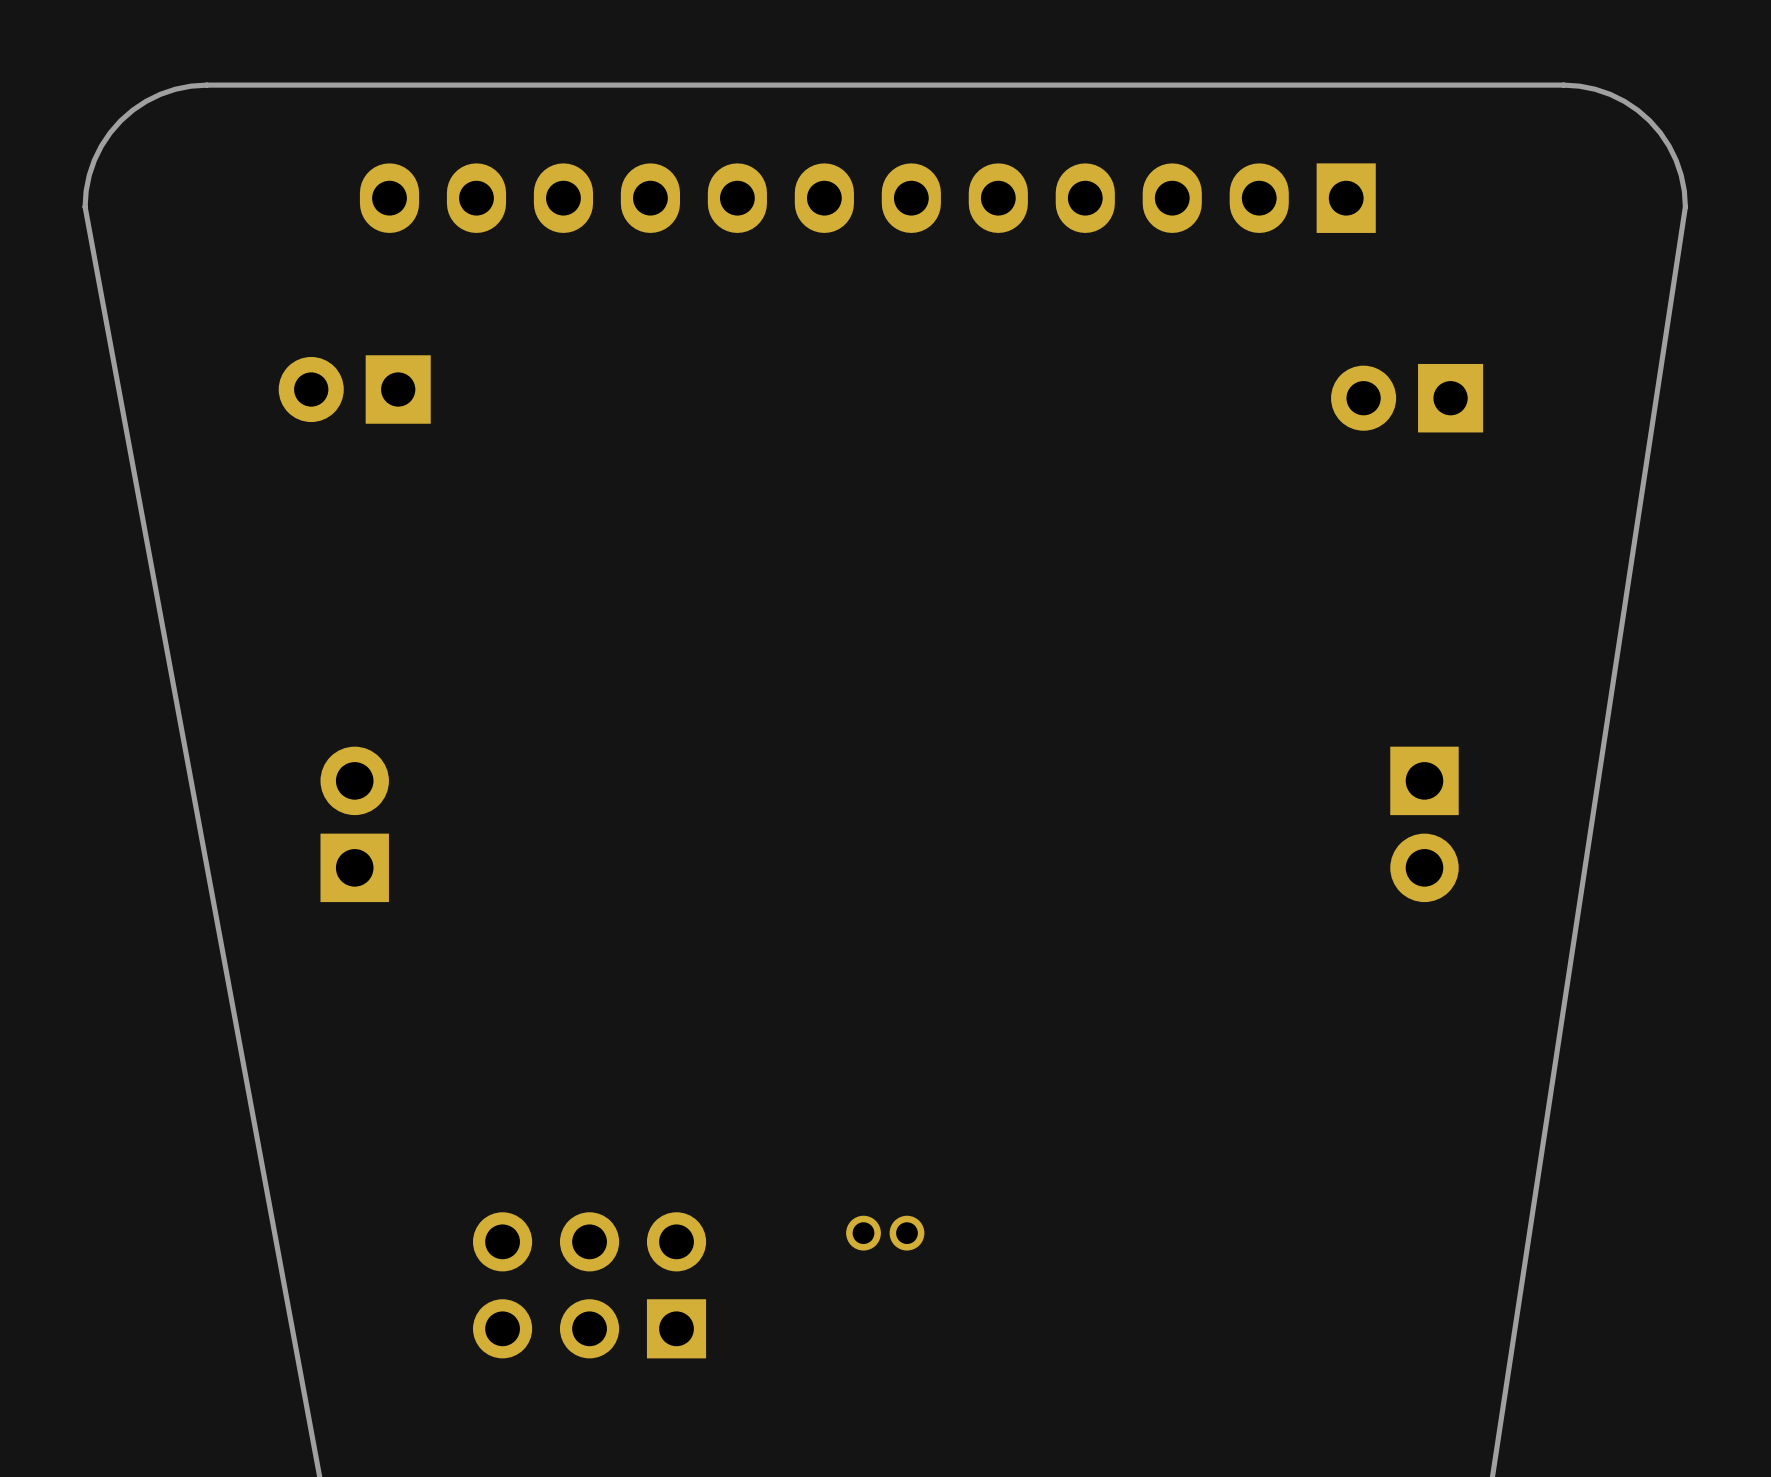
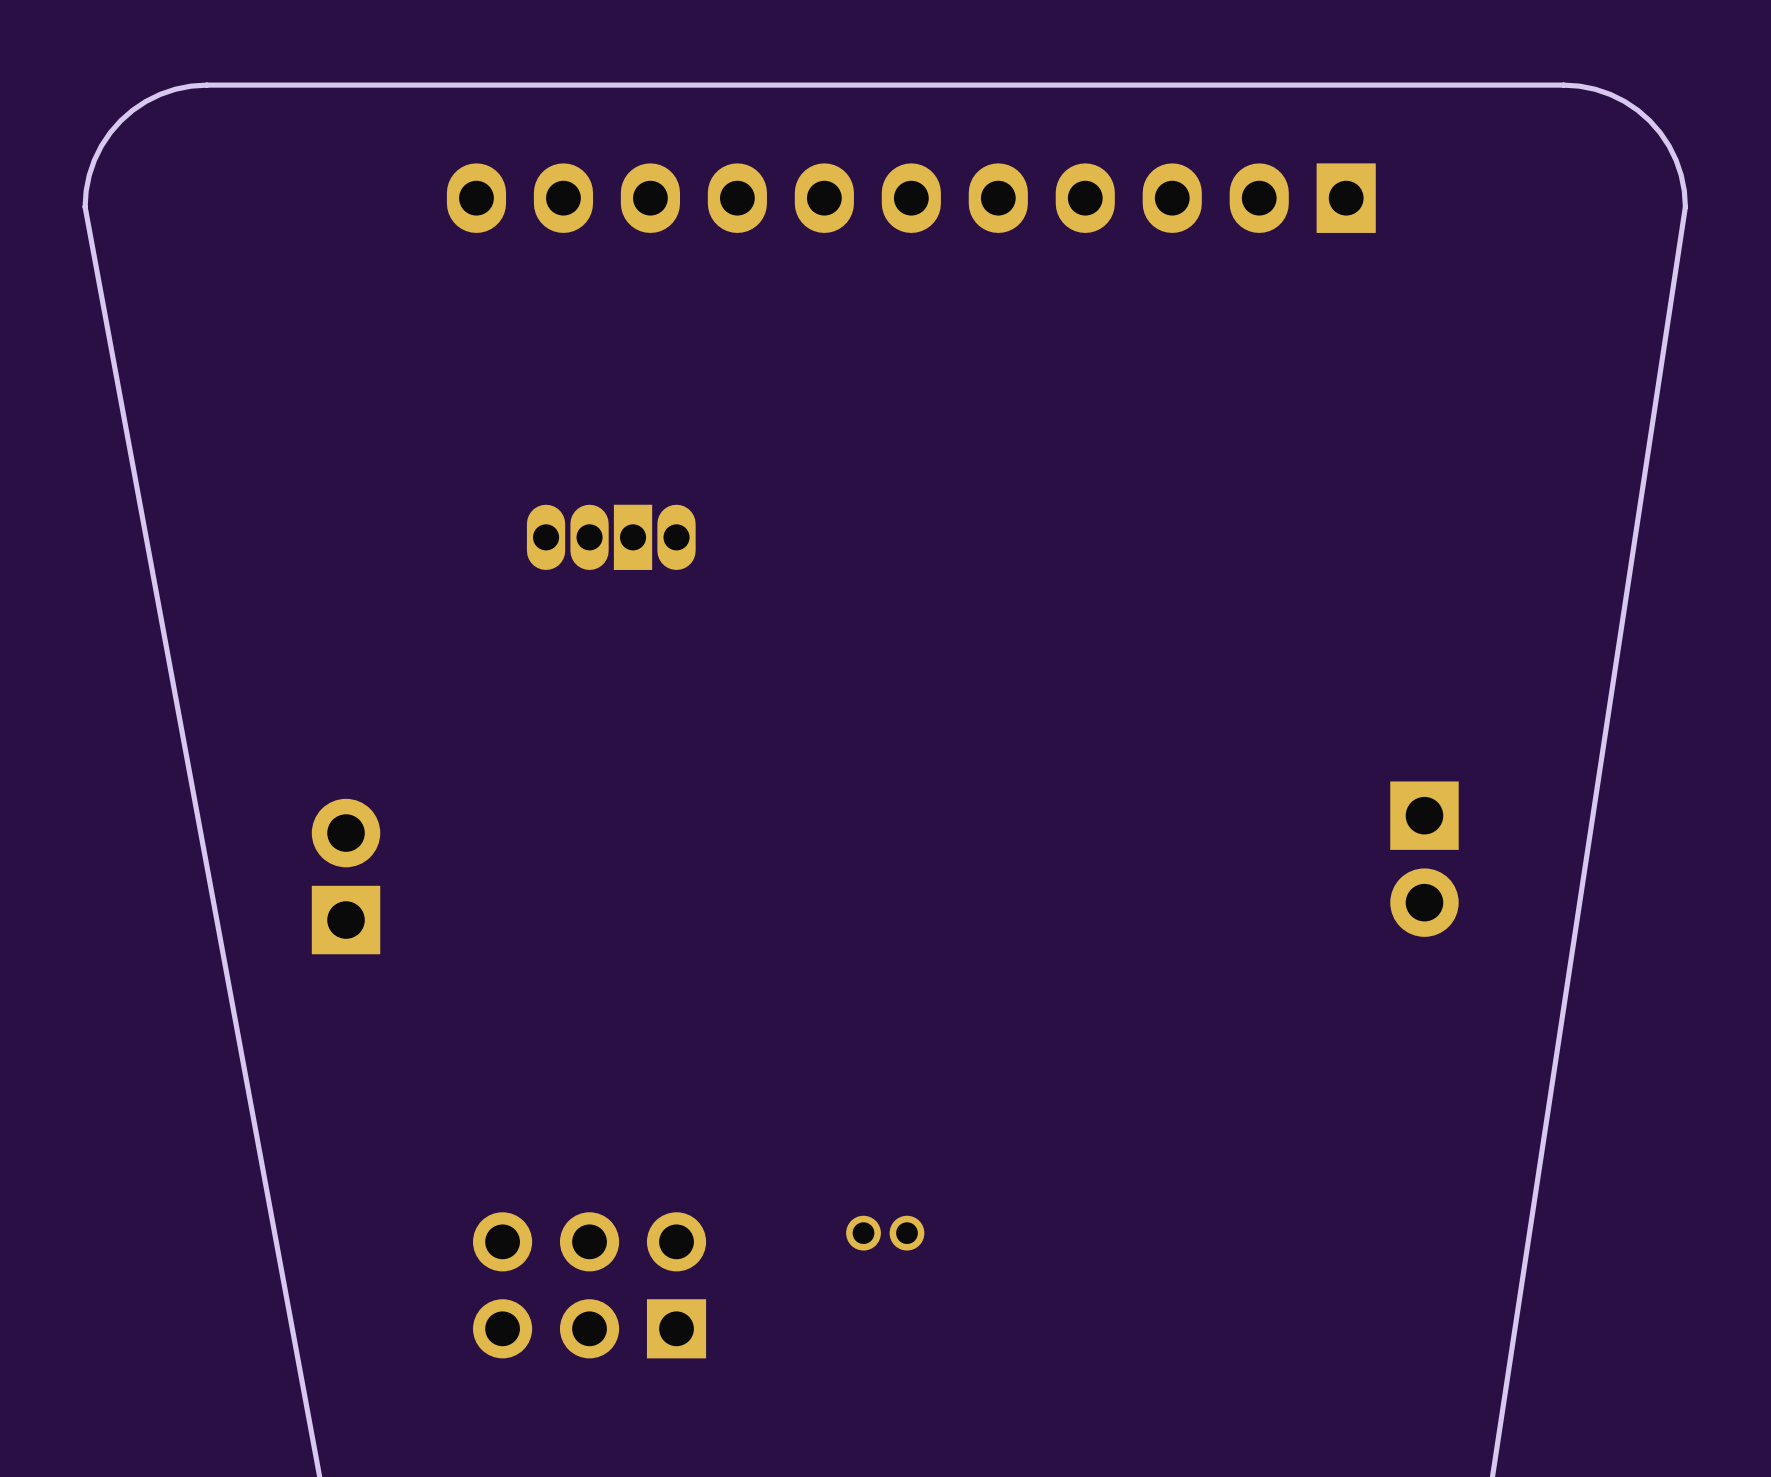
part: (867, 198) -> none
part: (354, 389) -> none
part: (1407, 398) -> none
part: none -> (611, 537)
part position: (354, 824) -> (346, 876)
part position: (1424, 824) -> (1424, 859)

